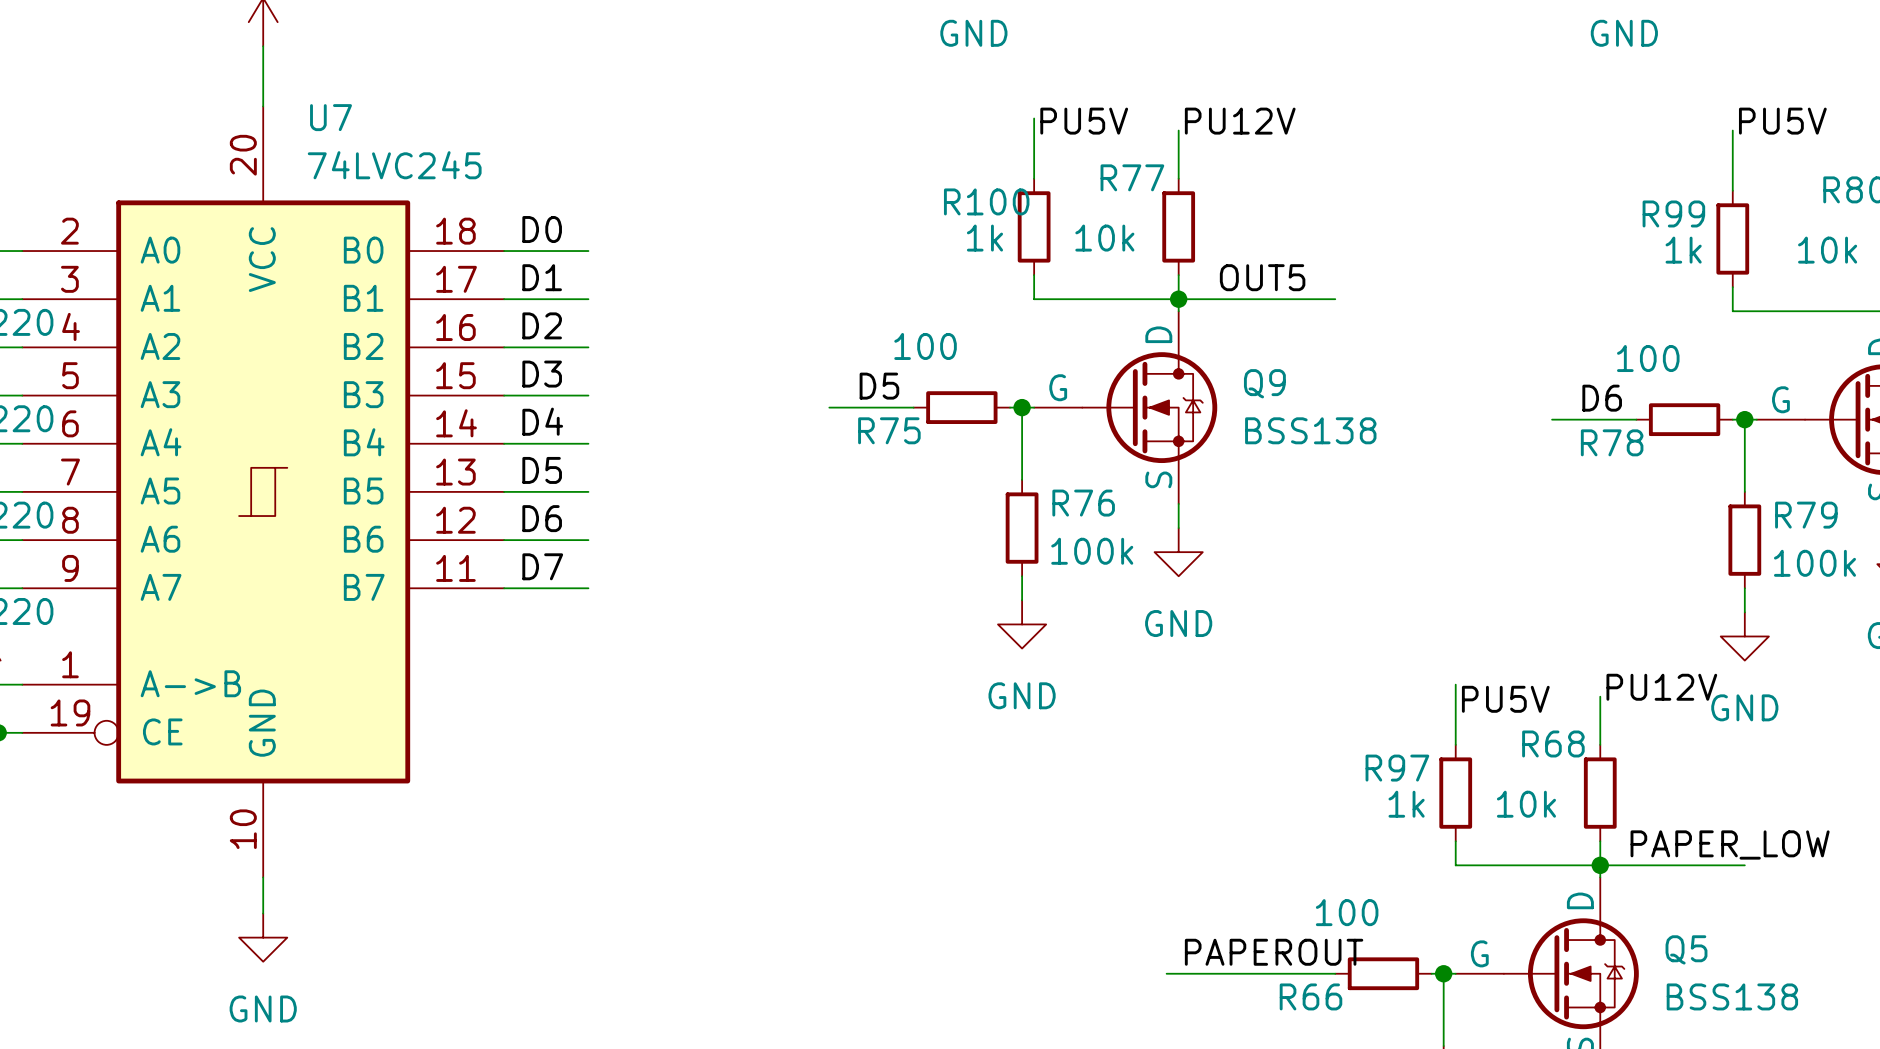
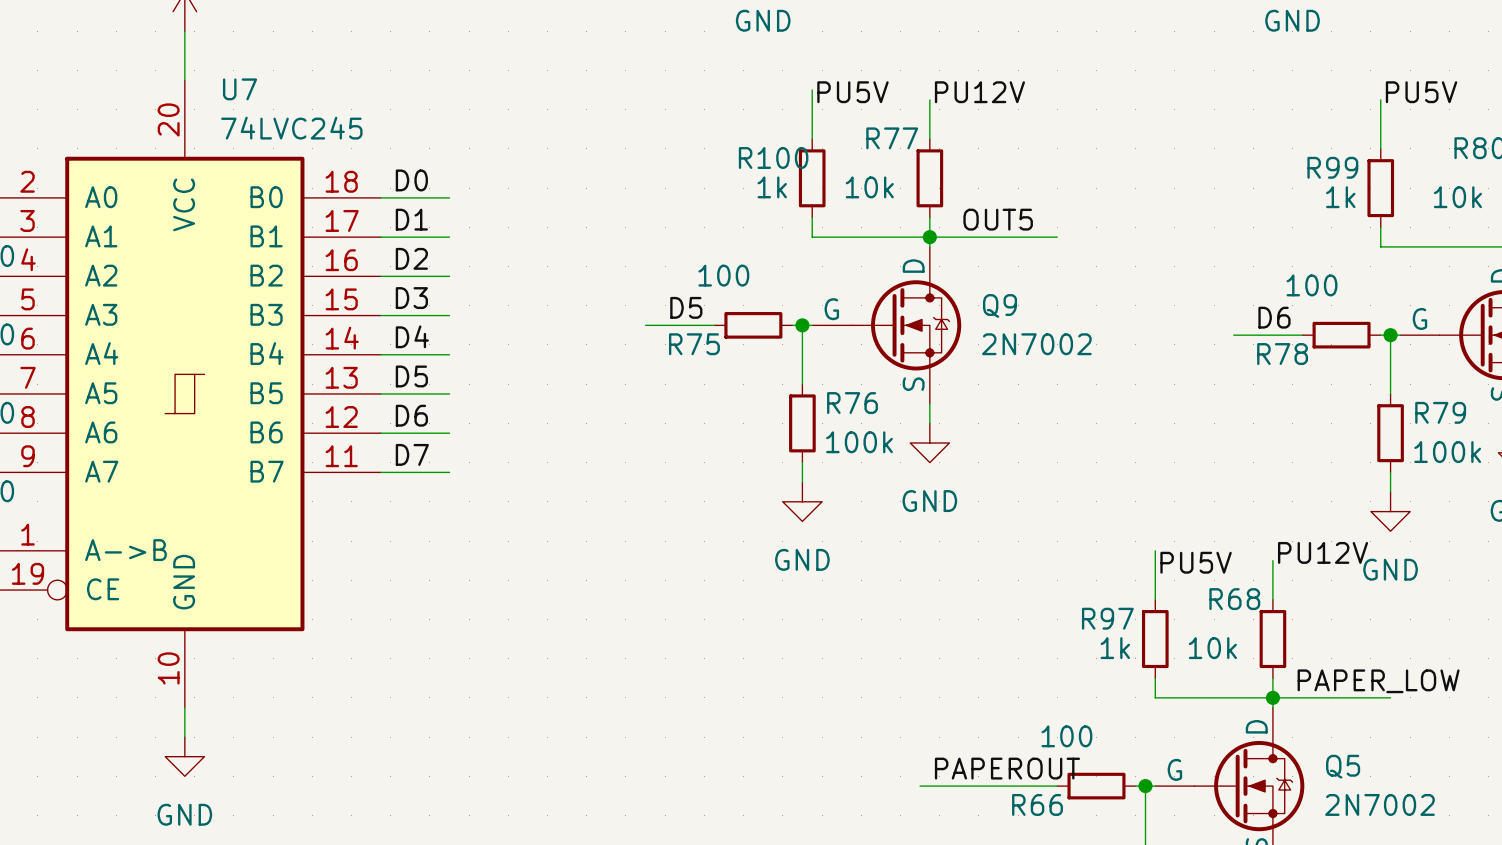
Q9 value: BSS138 (1310, 430) -> 2N7002 (1036, 344)
Q5 value: BSS138 (1732, 996) -> 2N7002 (1379, 804)

